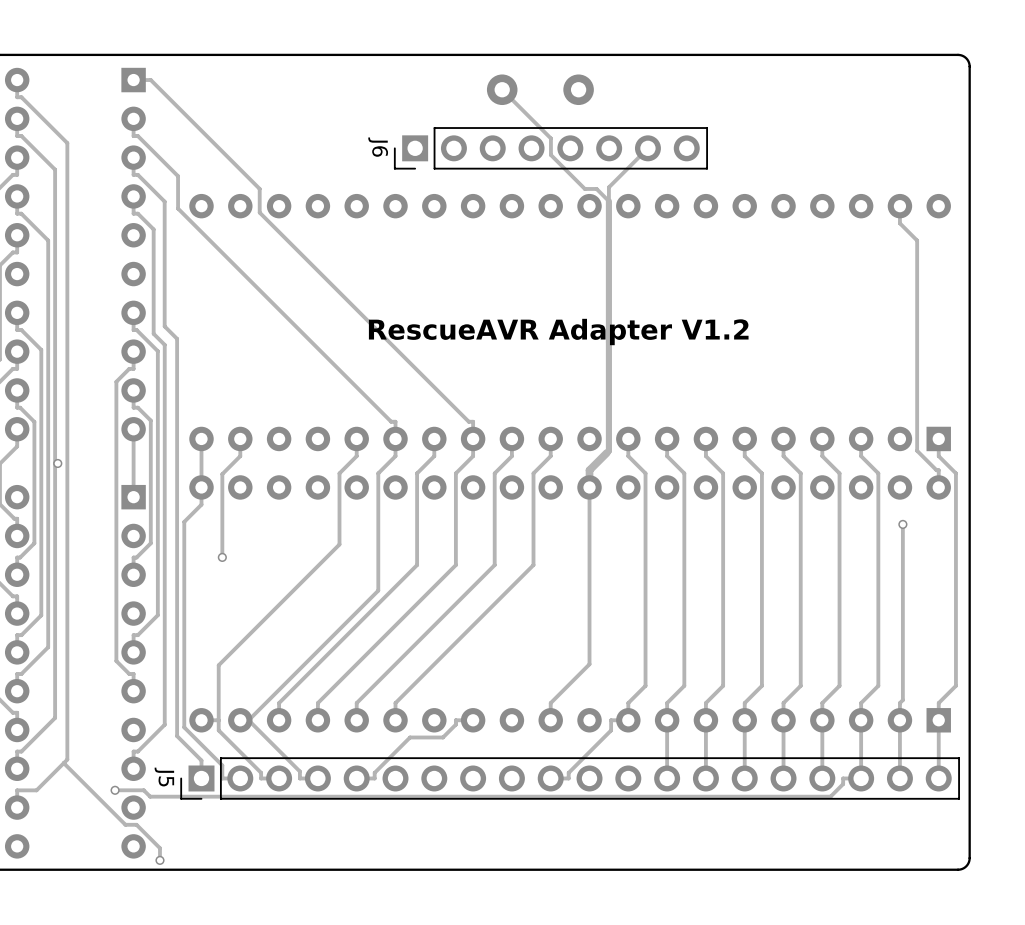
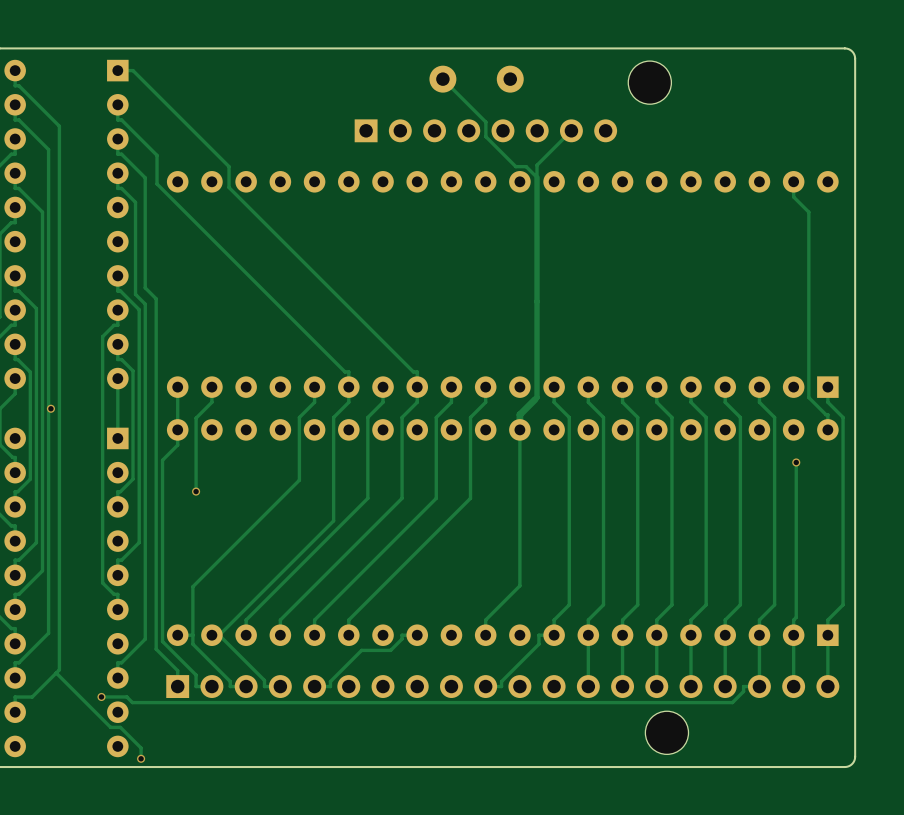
part: none -> (649, 82)
J6 side: bottom (550, 148) -> top (485, 130)
text: RescueAVR Adapter V1.2 (558, 332) -> none
J5 side: bottom (570, 778) -> top (502, 686)
part: none -> (666, 732)

